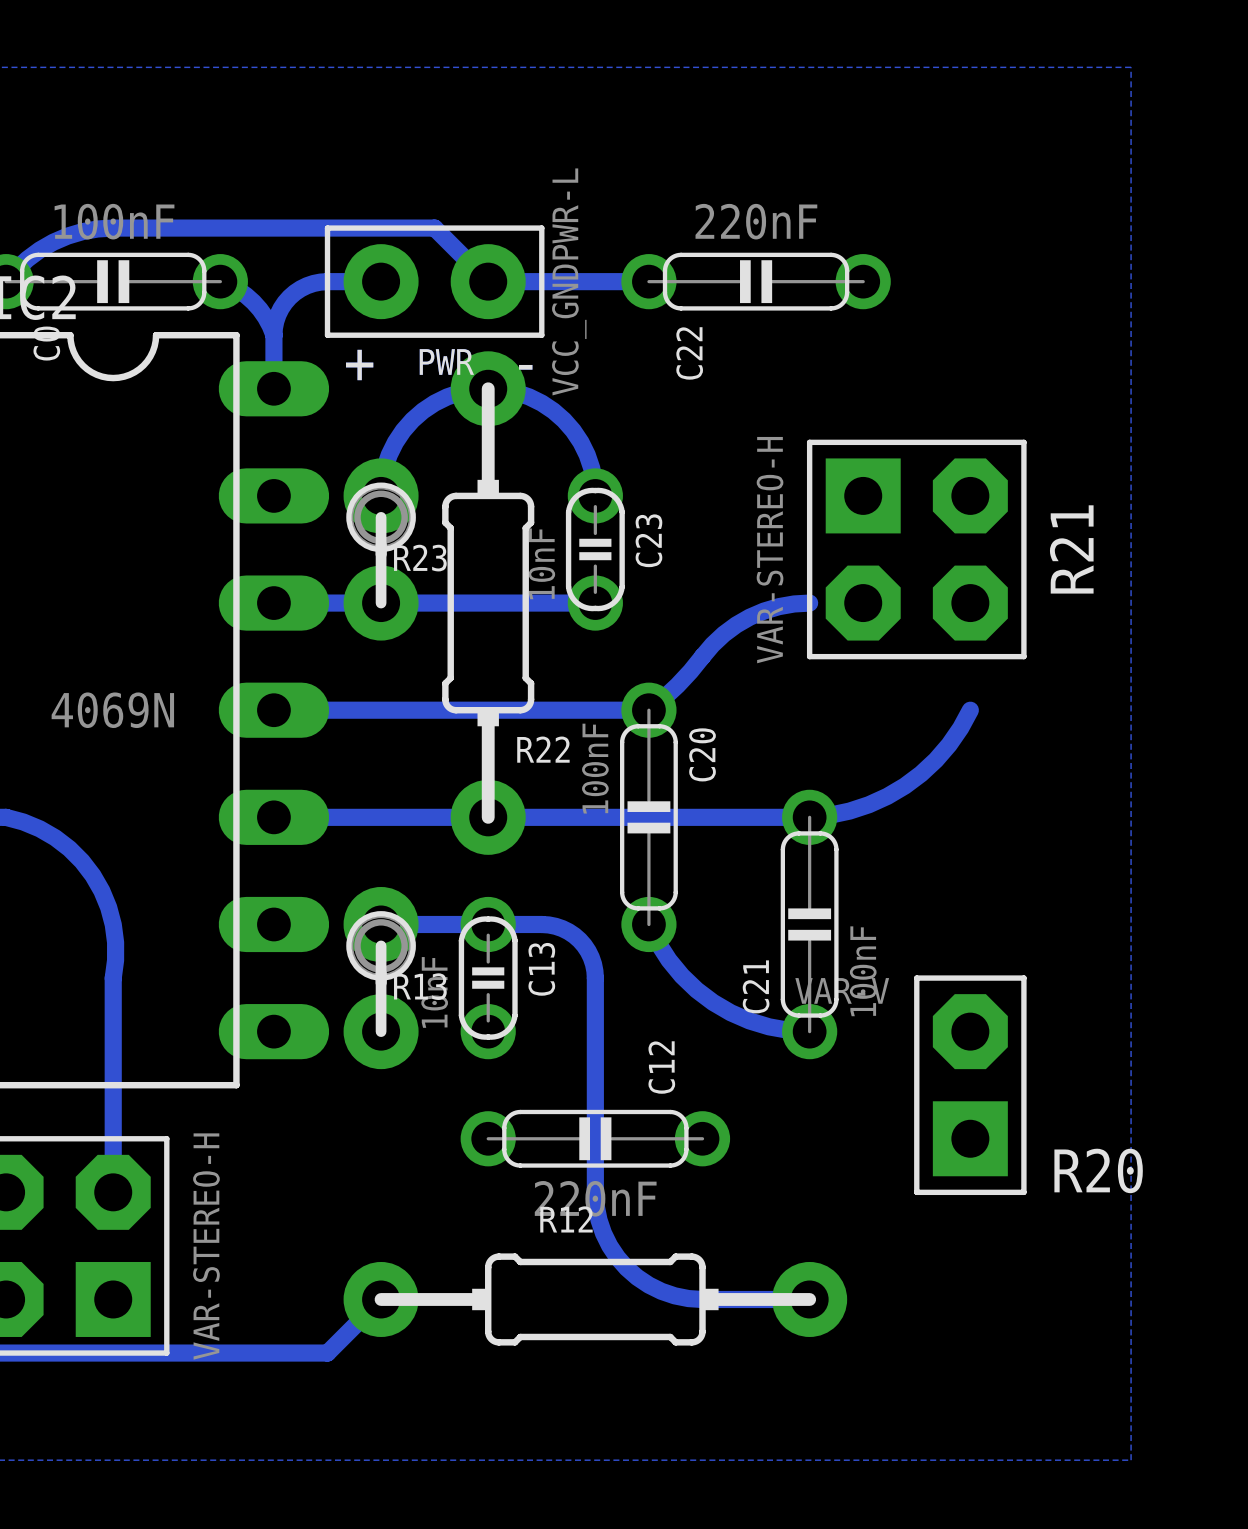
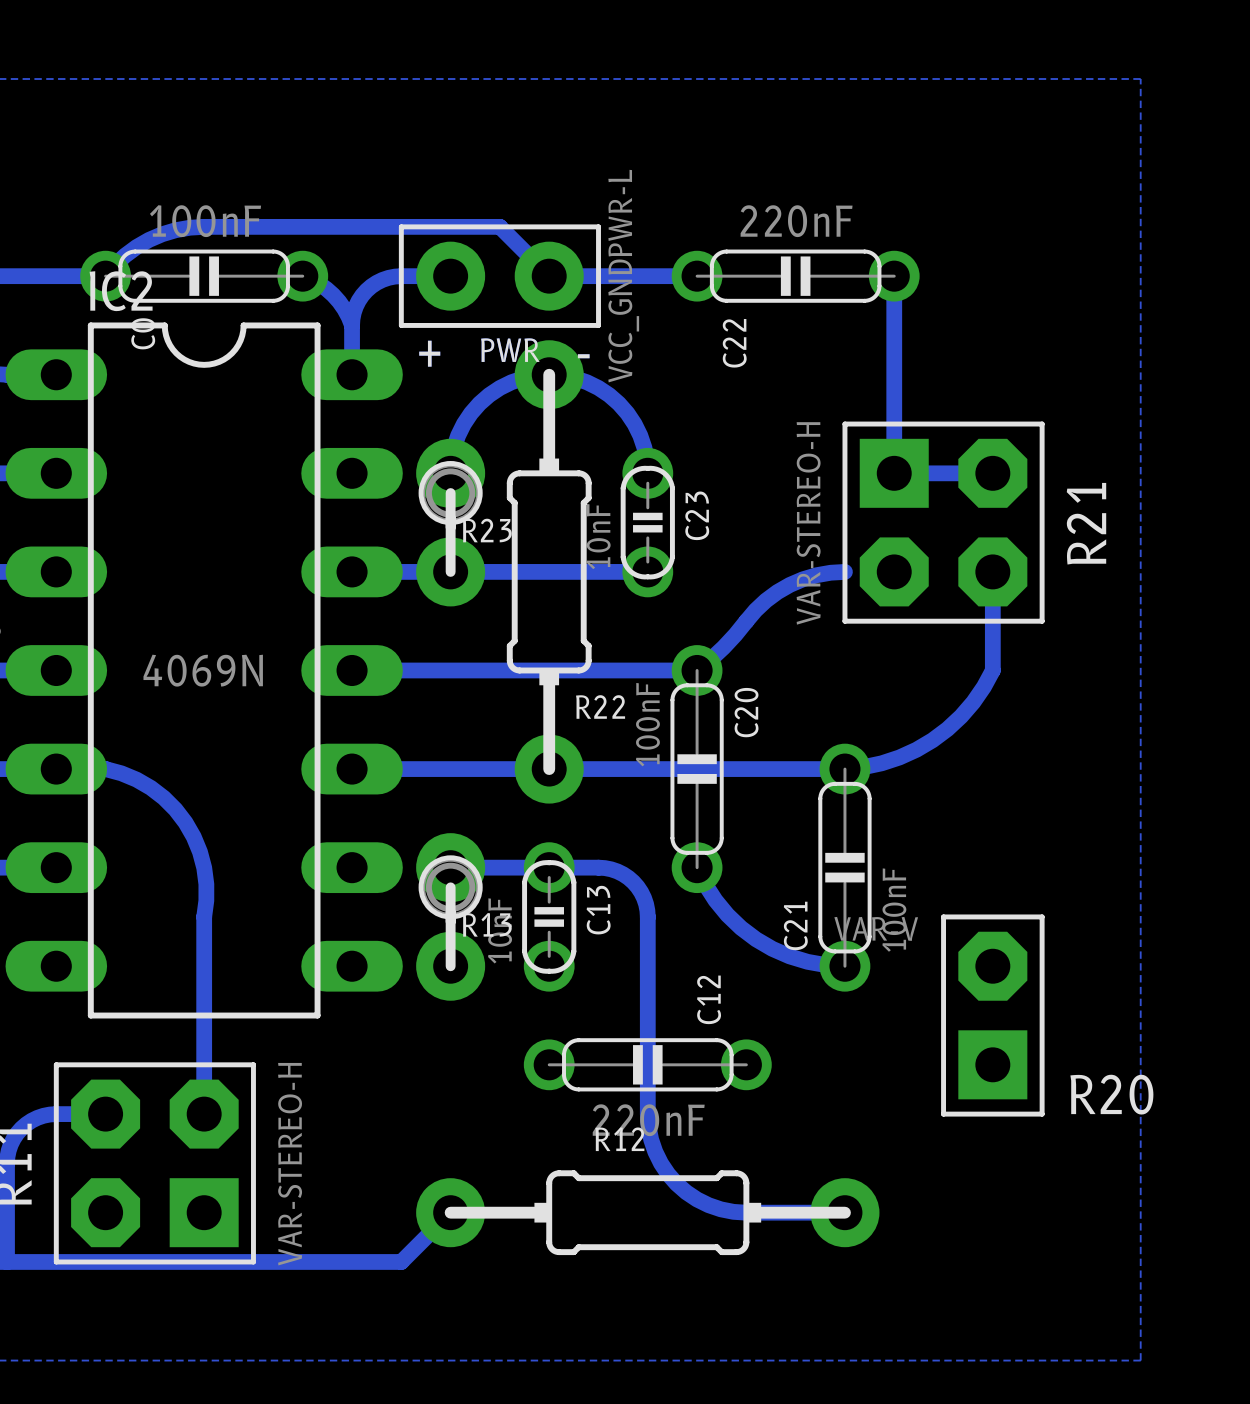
bottom track: none -> (894, 276) (894, 473) (992, 473)
bottom track: none -> (992, 571) (992, 670)

